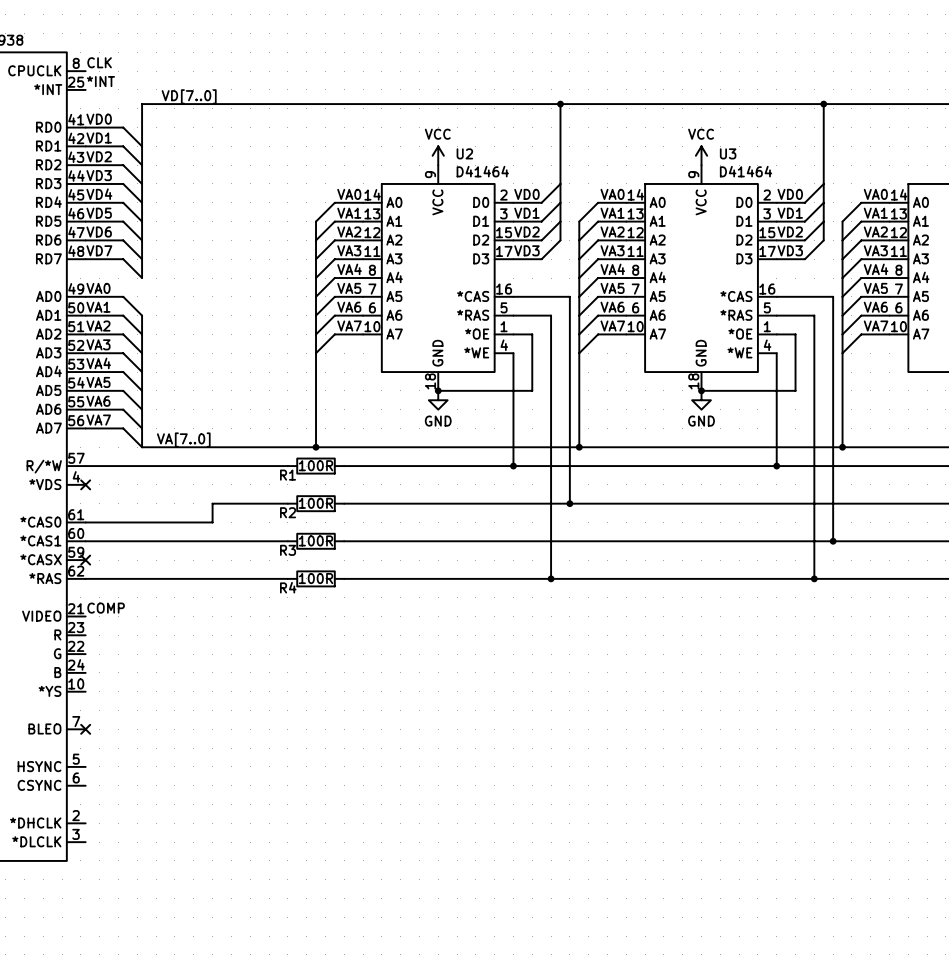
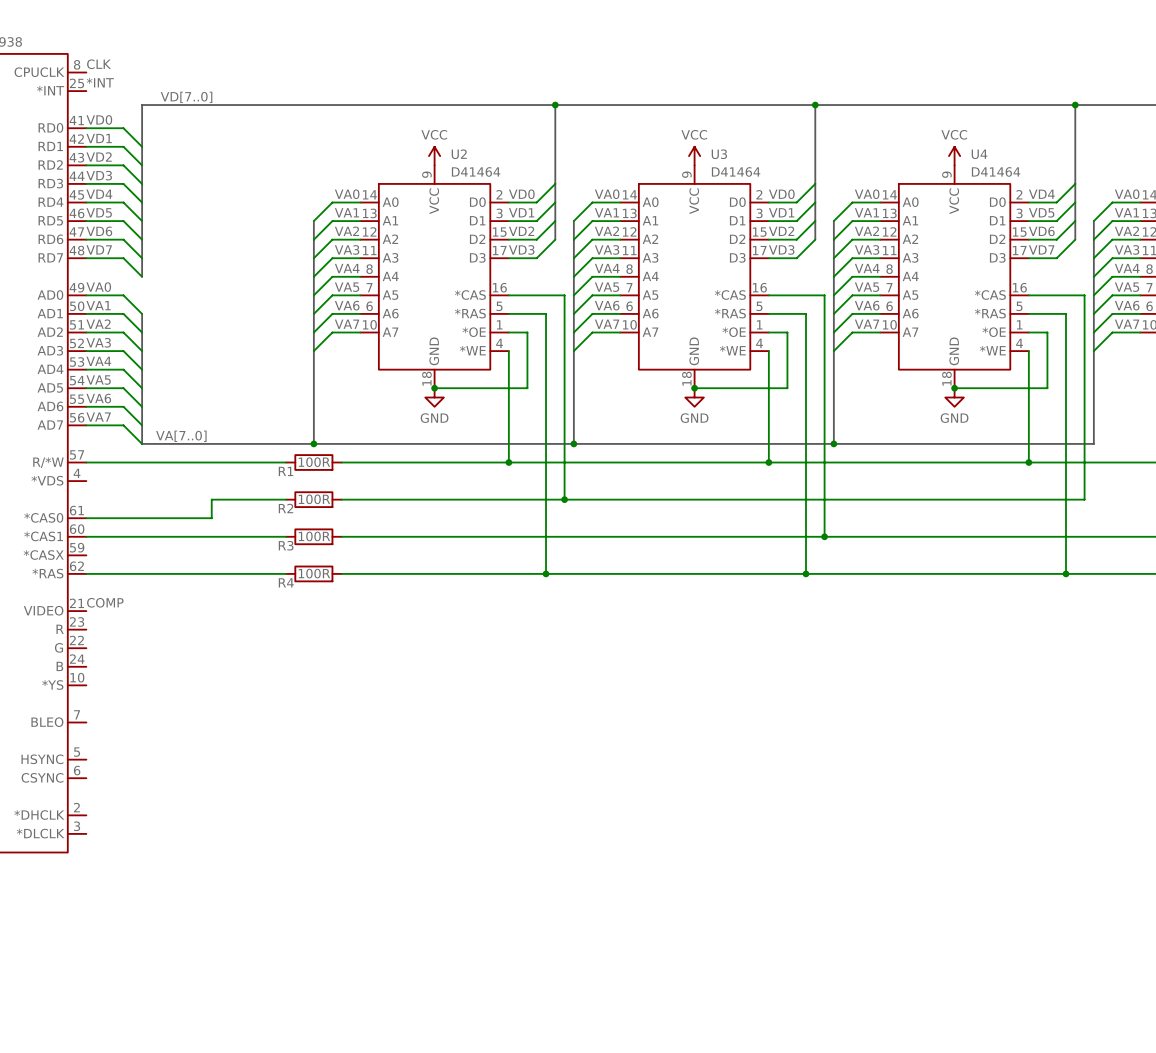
no-connect mark: (85, 484) -> none
no-connect mark: (85, 560) -> none
no-connect mark: (85, 729) -> none

